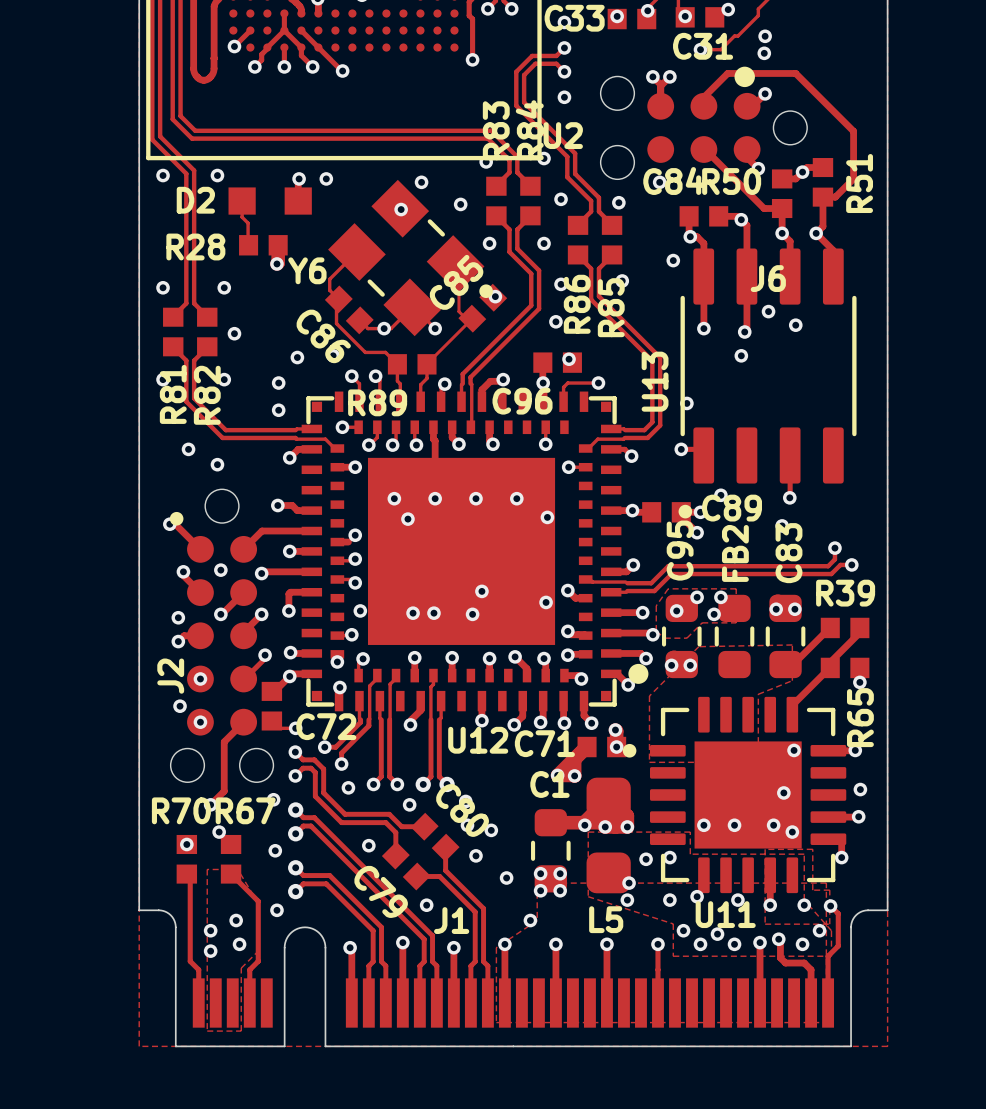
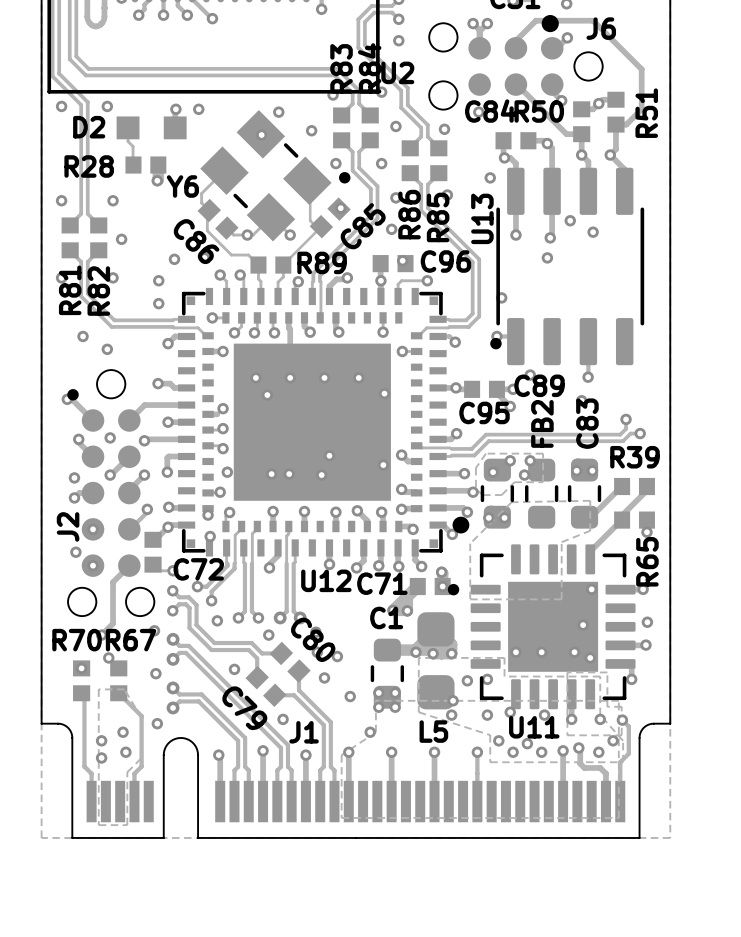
Y6 footprint: [328, 179, 493, 337] -> [200, 110, 351, 242]
U13 footprint: [678, 248, 857, 519] -> [490, 167, 645, 366]
J6 name position: J6 (768, 278) -> J6 (601, 28)
C85 name position: C85 (456, 282) -> C85 (363, 226)
C96 name position: C96 (522, 401) -> C96 (445, 261)
R89 name position: R89 (377, 402) -> R89 (322, 262)
C95 name rotation: 0° (680, 550) -> 90° clockwise (484, 412)

